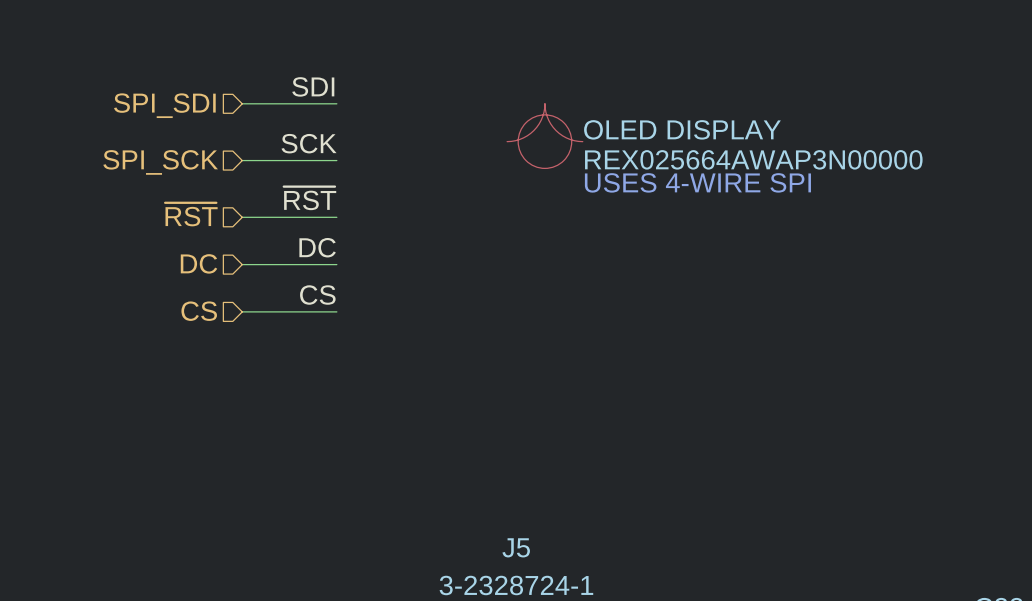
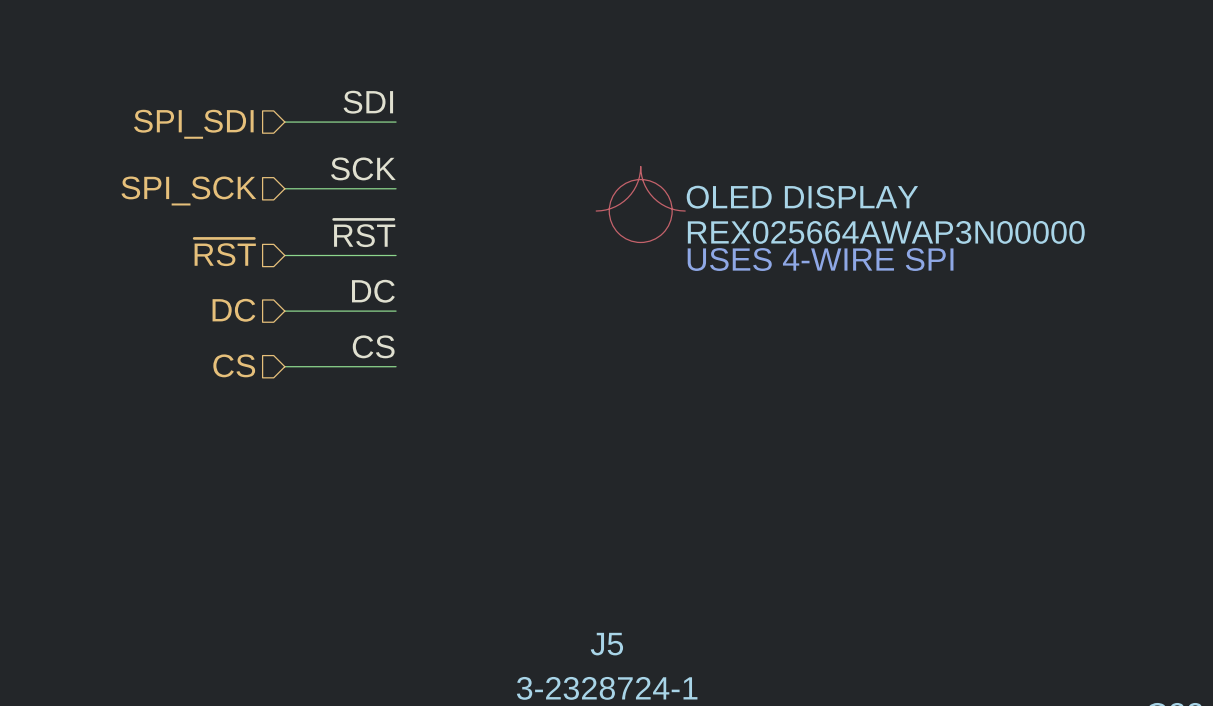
part position: (544, 136) -> (640, 204)
text position: USES 4-WIRE SPI (697, 182) -> USES 4-WIRE SPI (820, 259)

